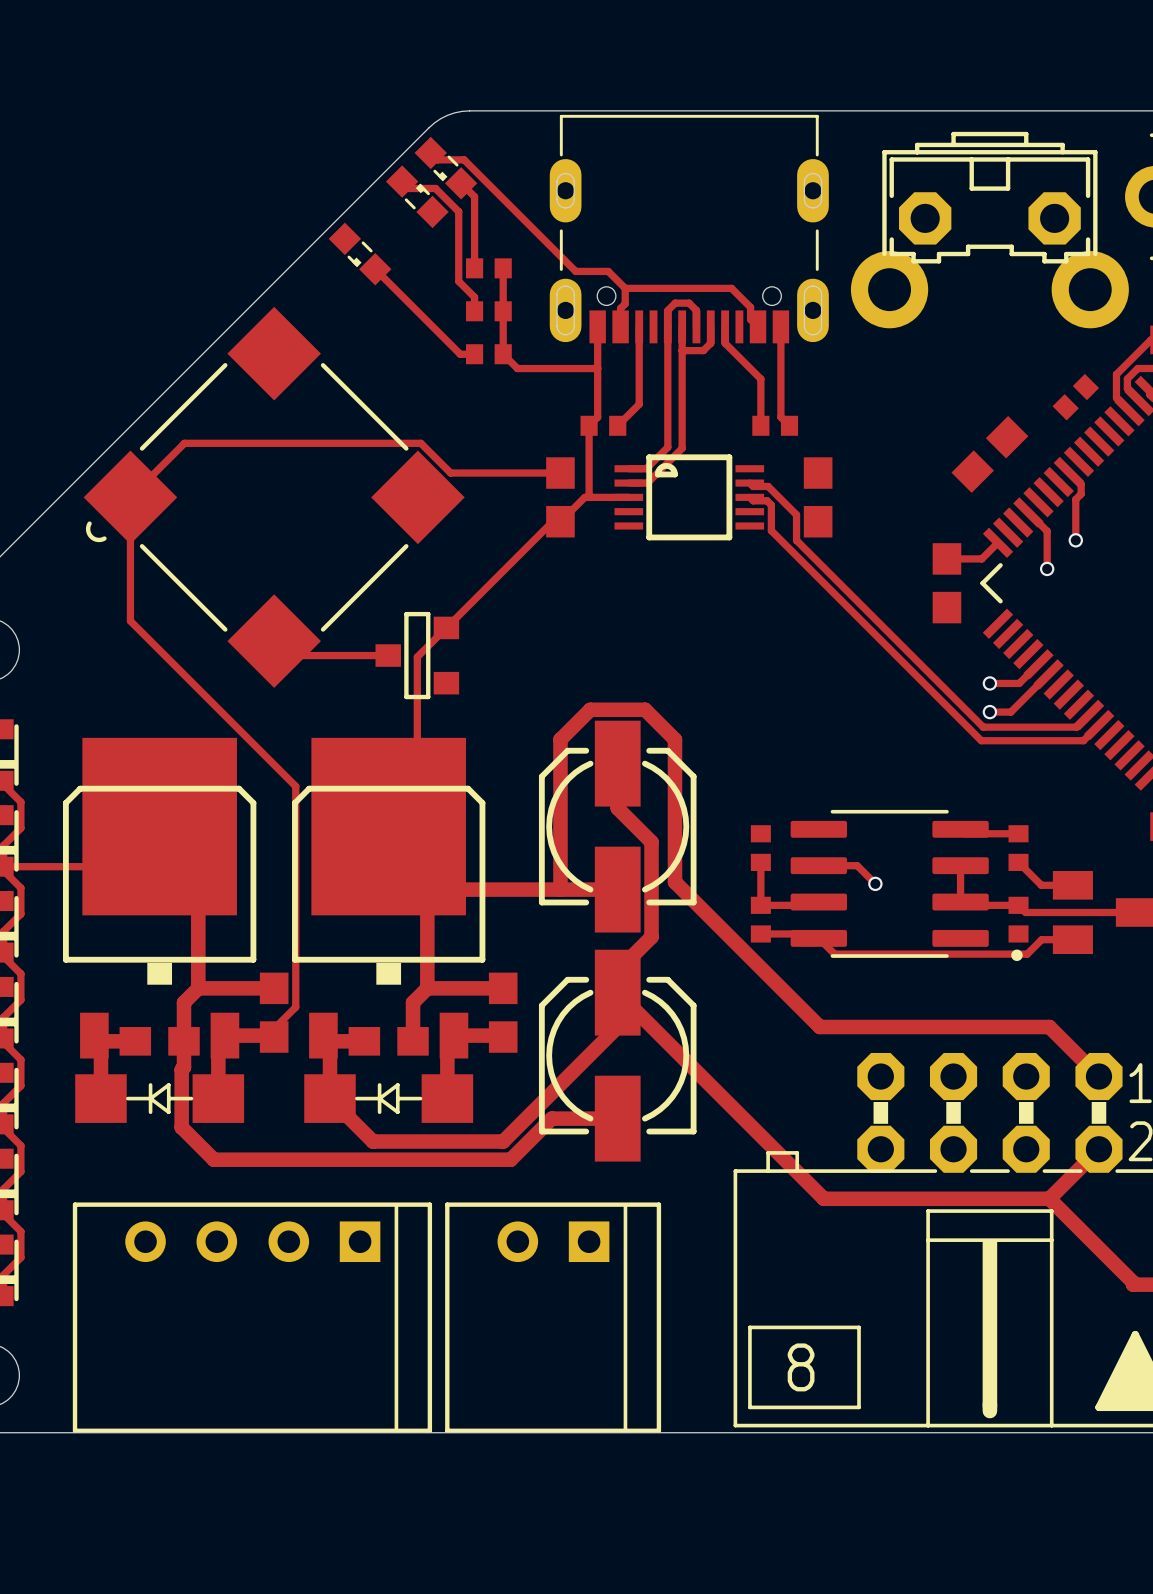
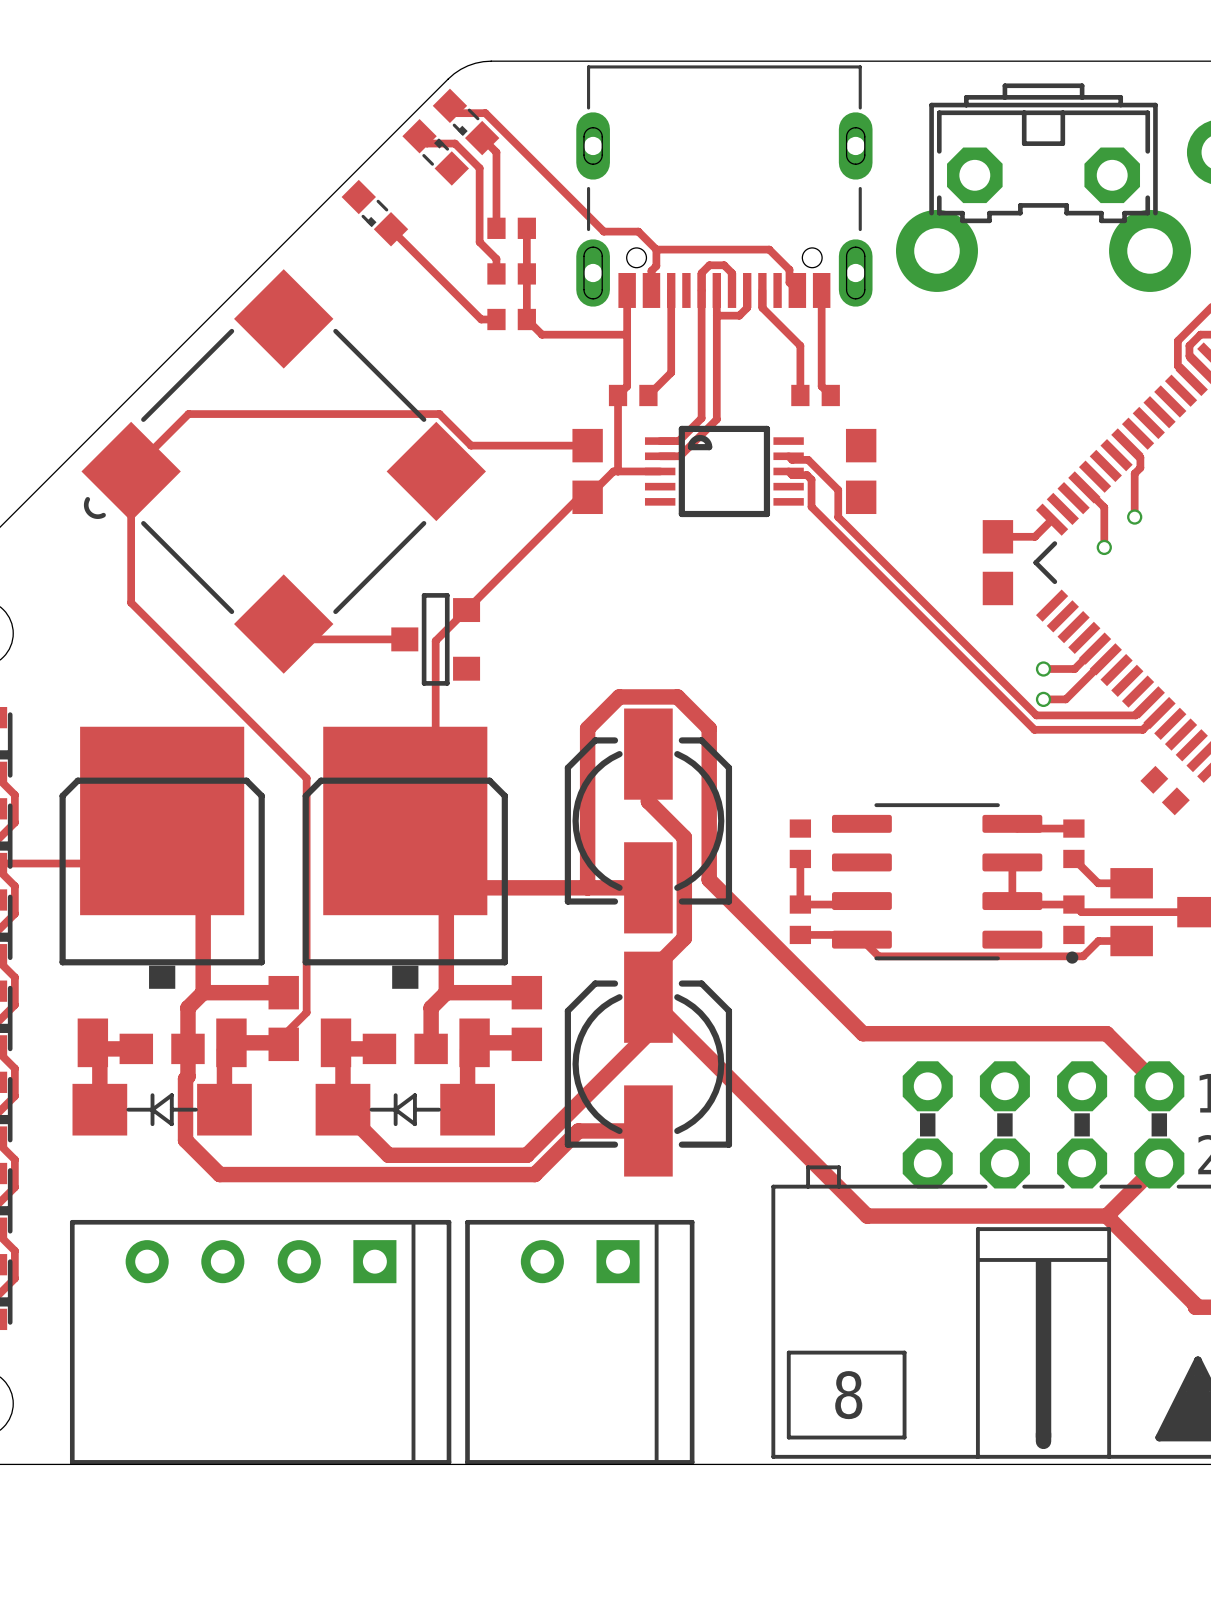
part rotation: 0° (1075, 397) -> 90° clockwise (1165, 790)
part position: (1075, 397) -> (1165, 790)
part: (989, 454) -> none
track: (818, 865) (857, 865) (875, 883) -> none
via: (875, 883) -> none

